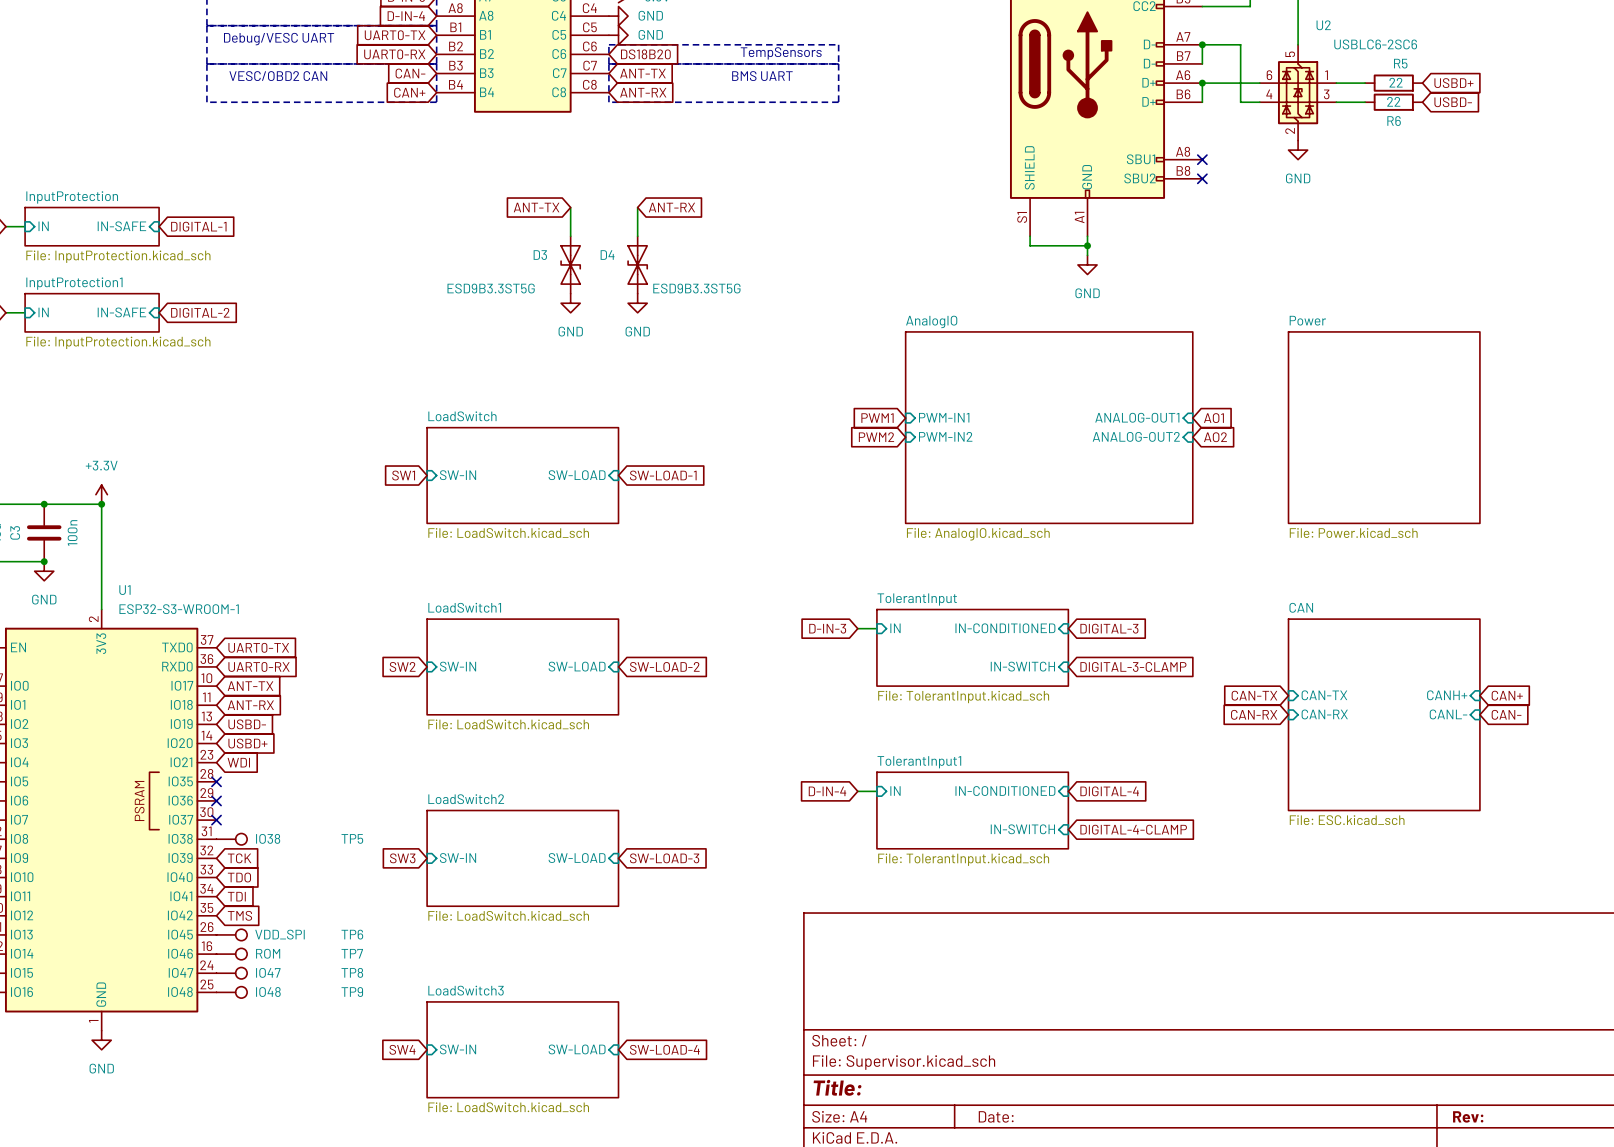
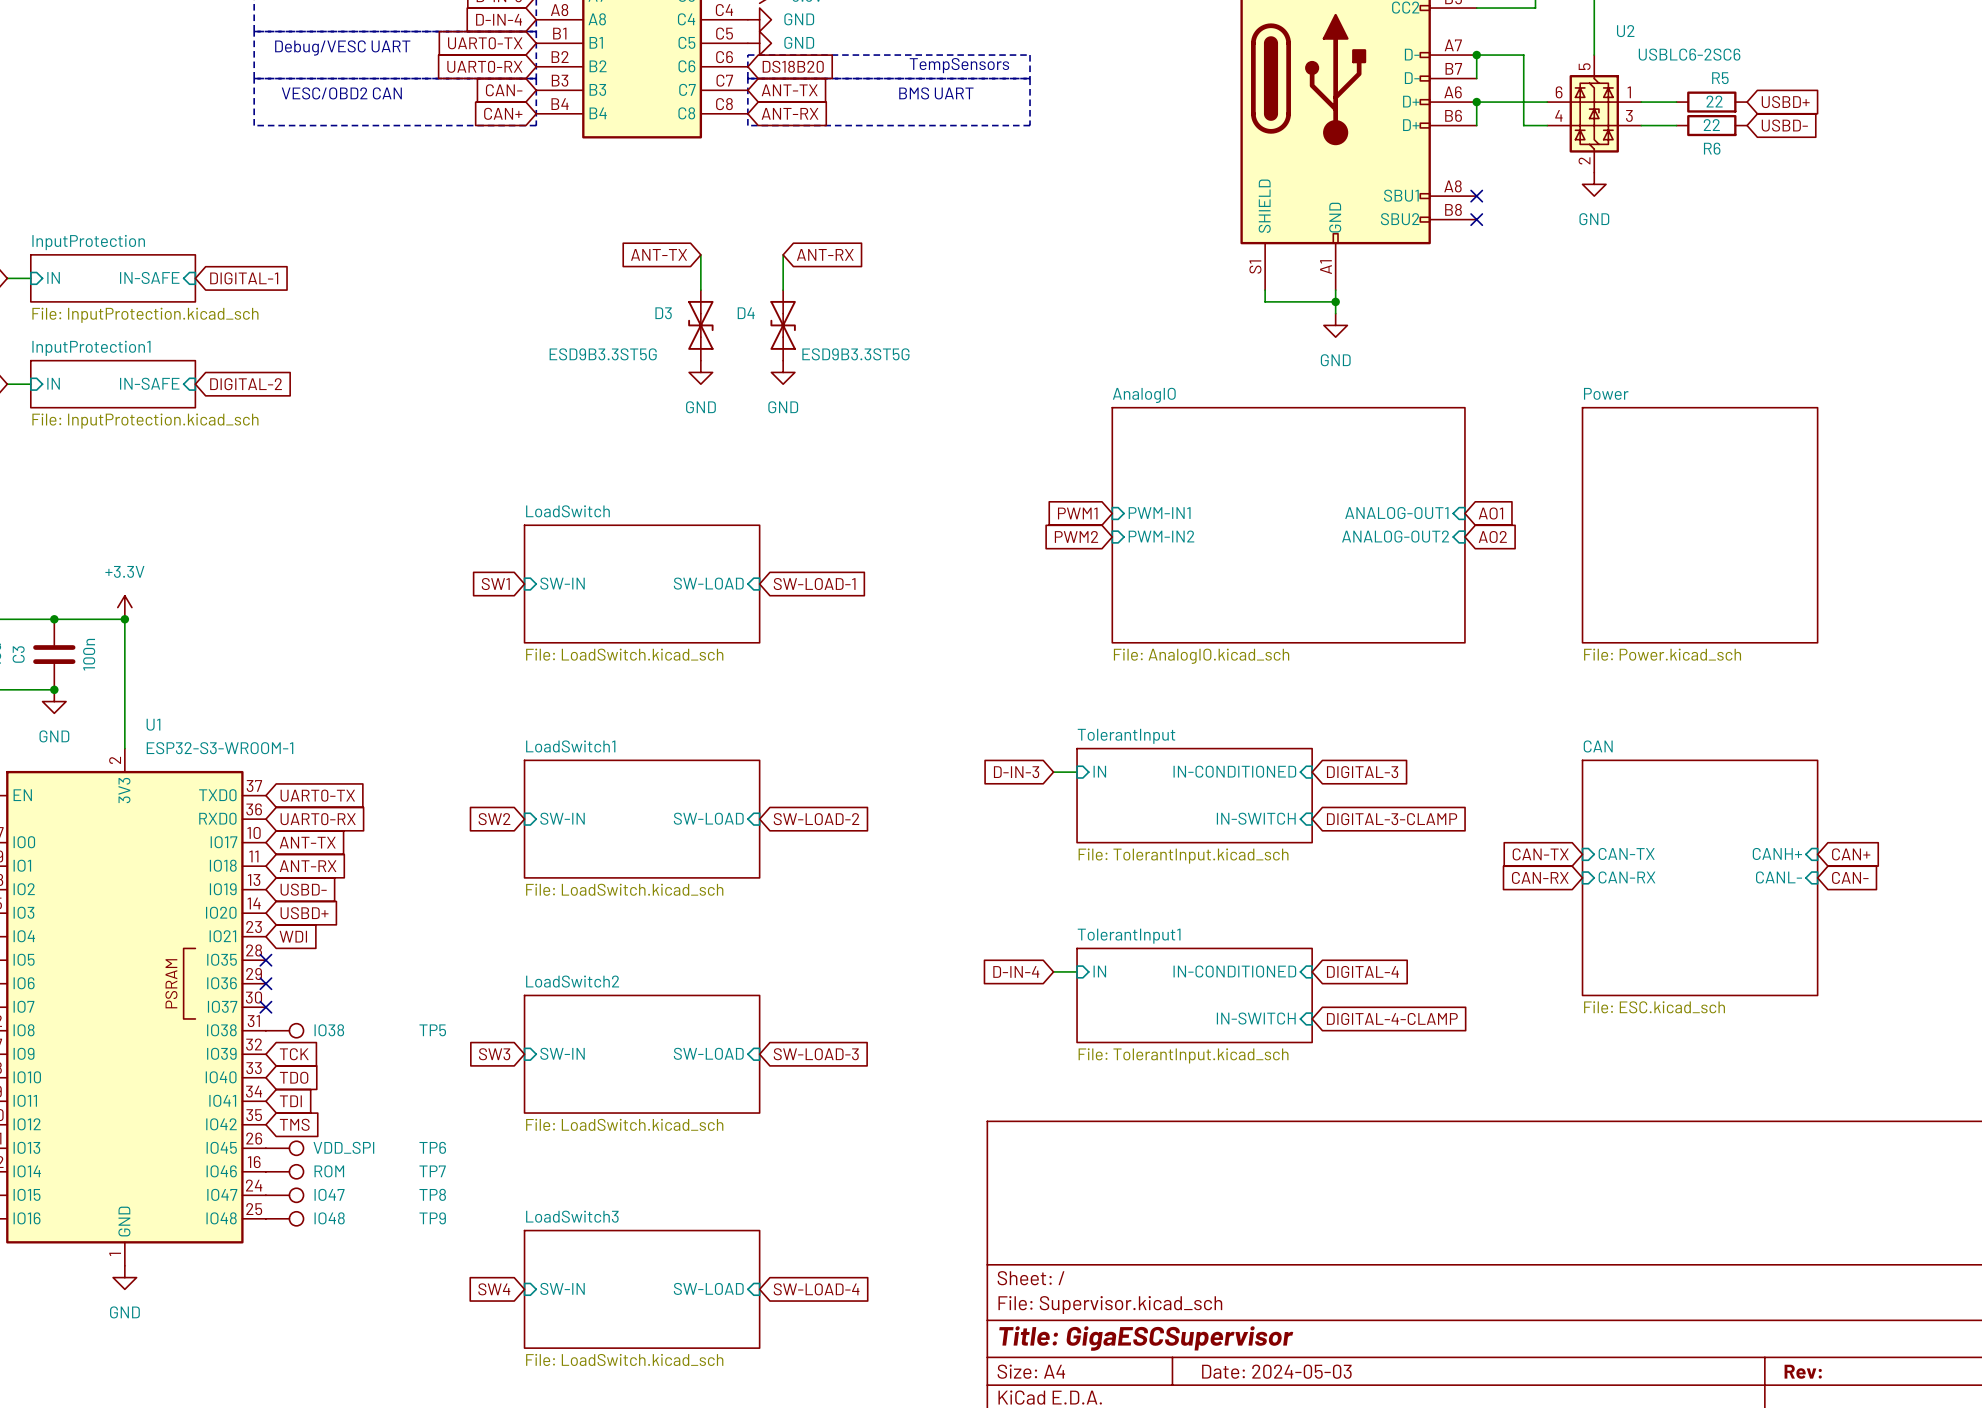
title block: Title: (837, 1087) -> Title: GigaESCSupervisor (1146, 1338)
title block: Date: (996, 1116) -> Date: 2024-05-03 (1276, 1371)

